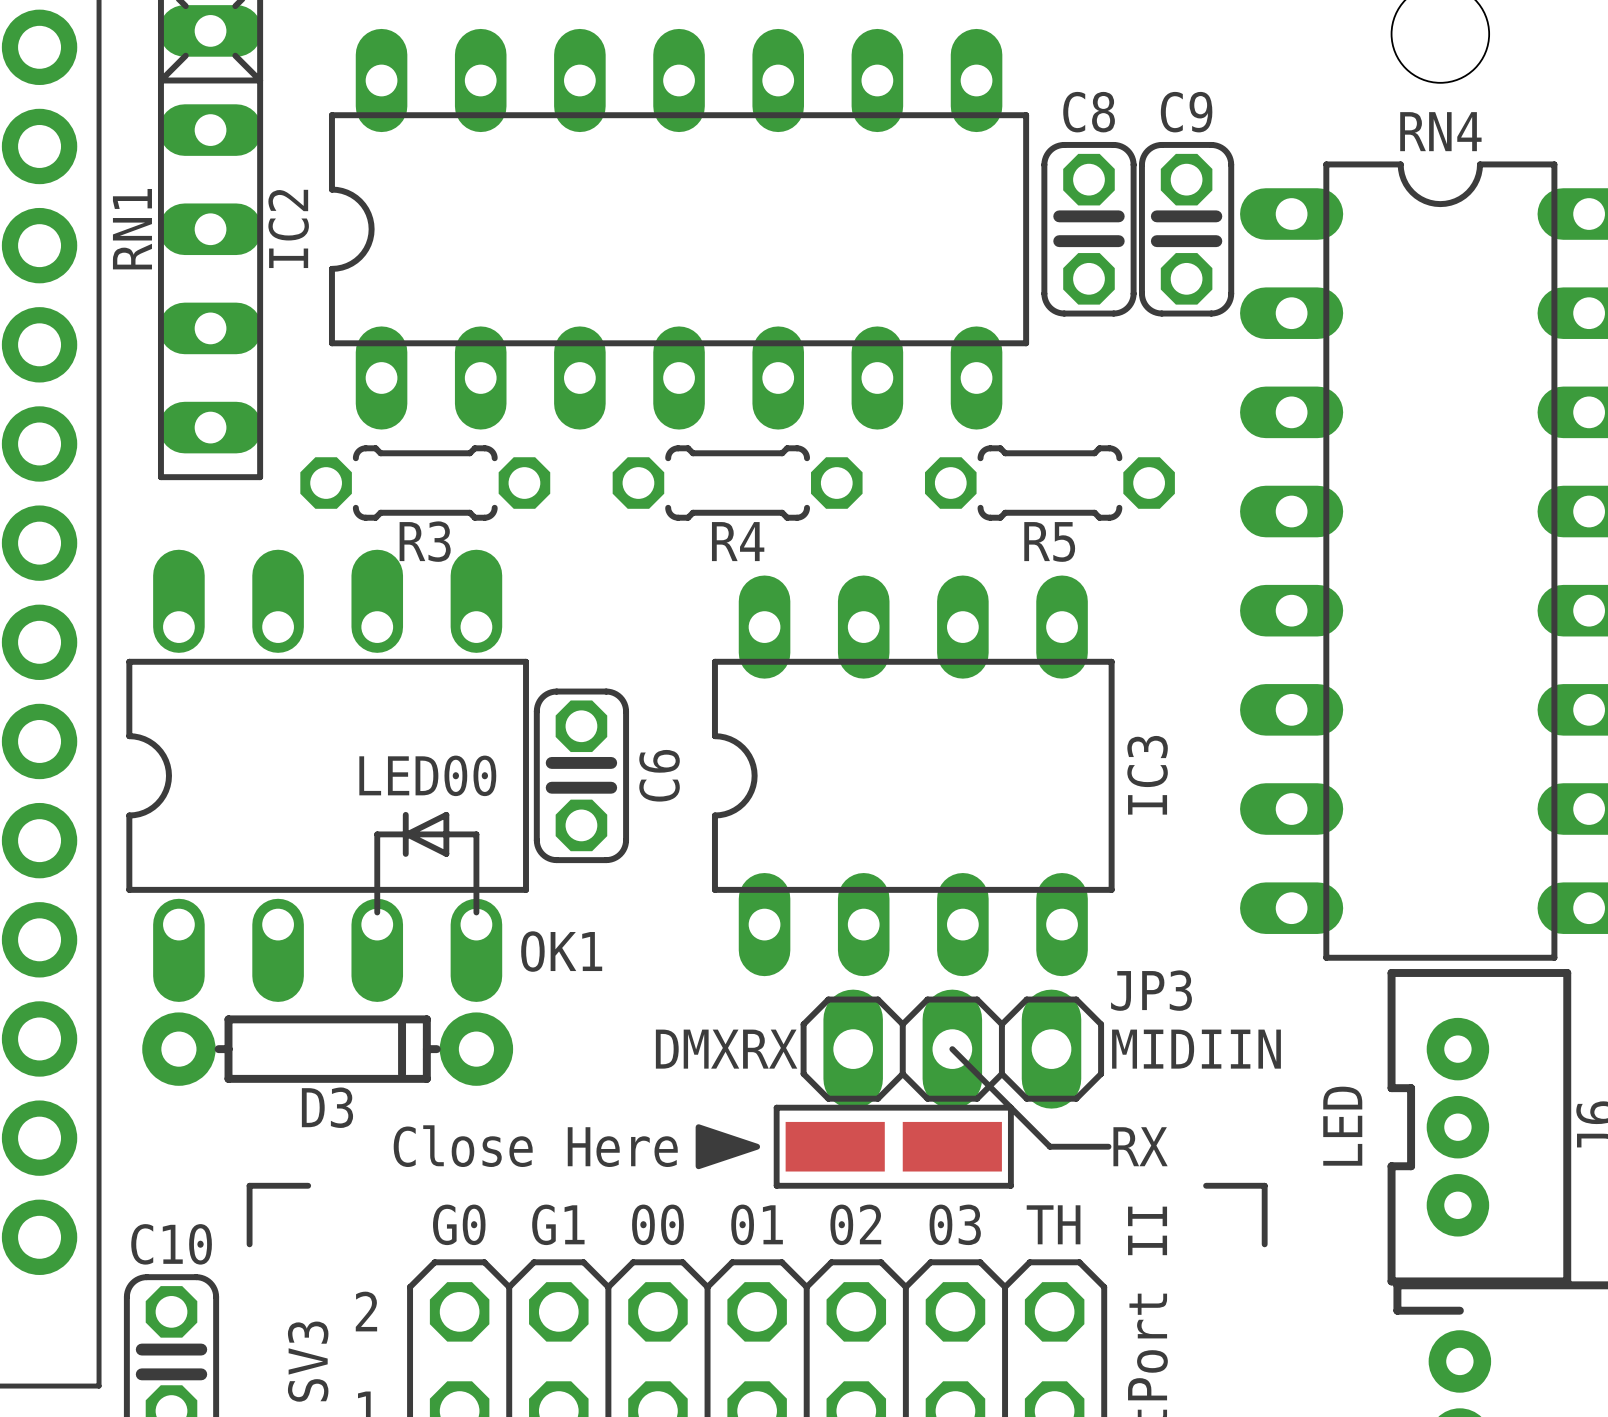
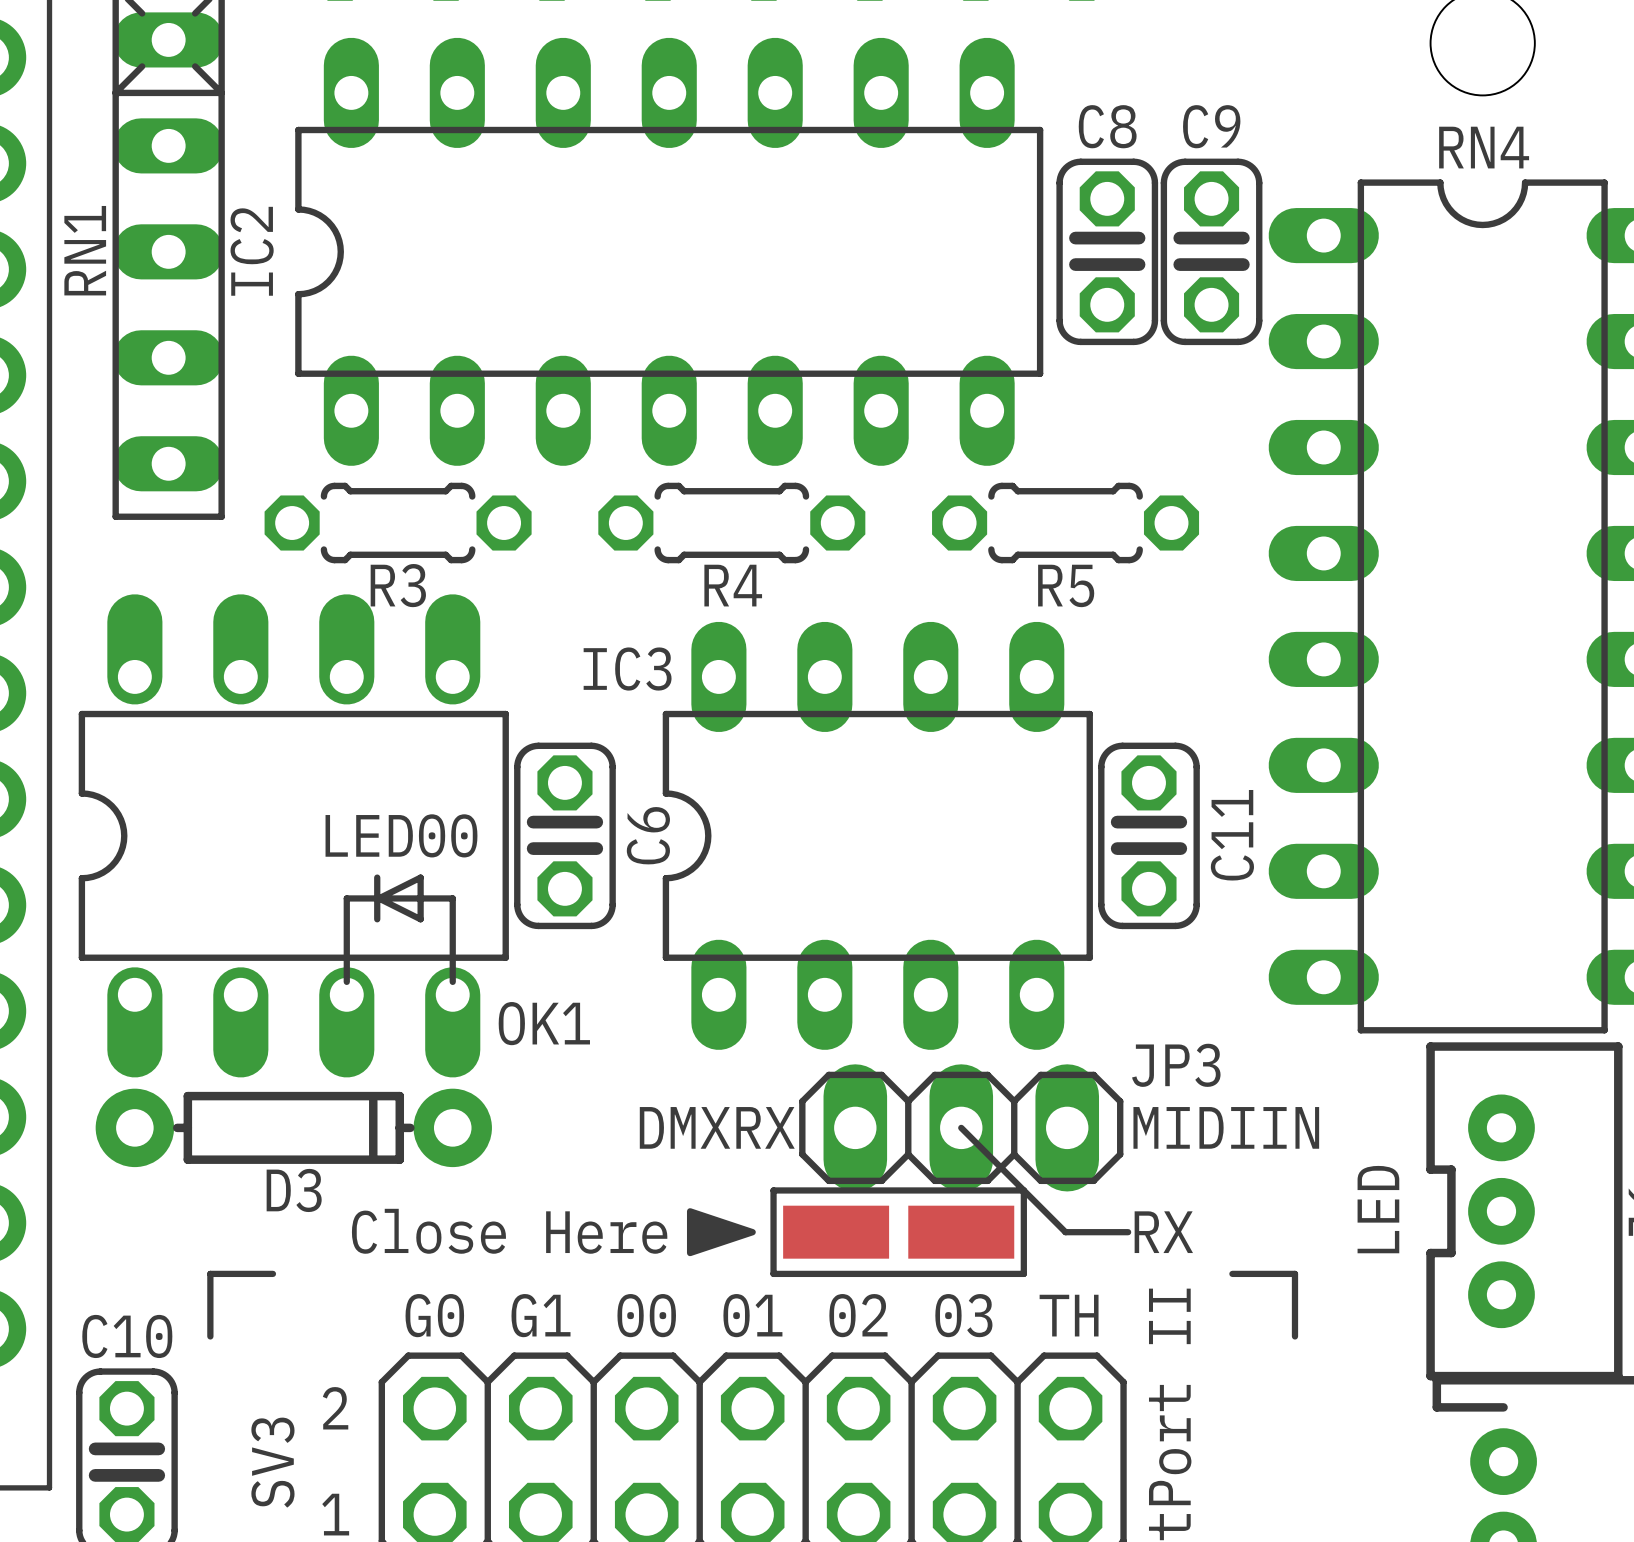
IC3 position: (913, 775) -> (877, 835)
C11: none -> (1148, 835)
IC3 name rotation: 0° (1147, 775) -> 90° clockwise (627, 669)
IC3 name position: IC3 (1147, 775) -> IC3 (627, 669)

